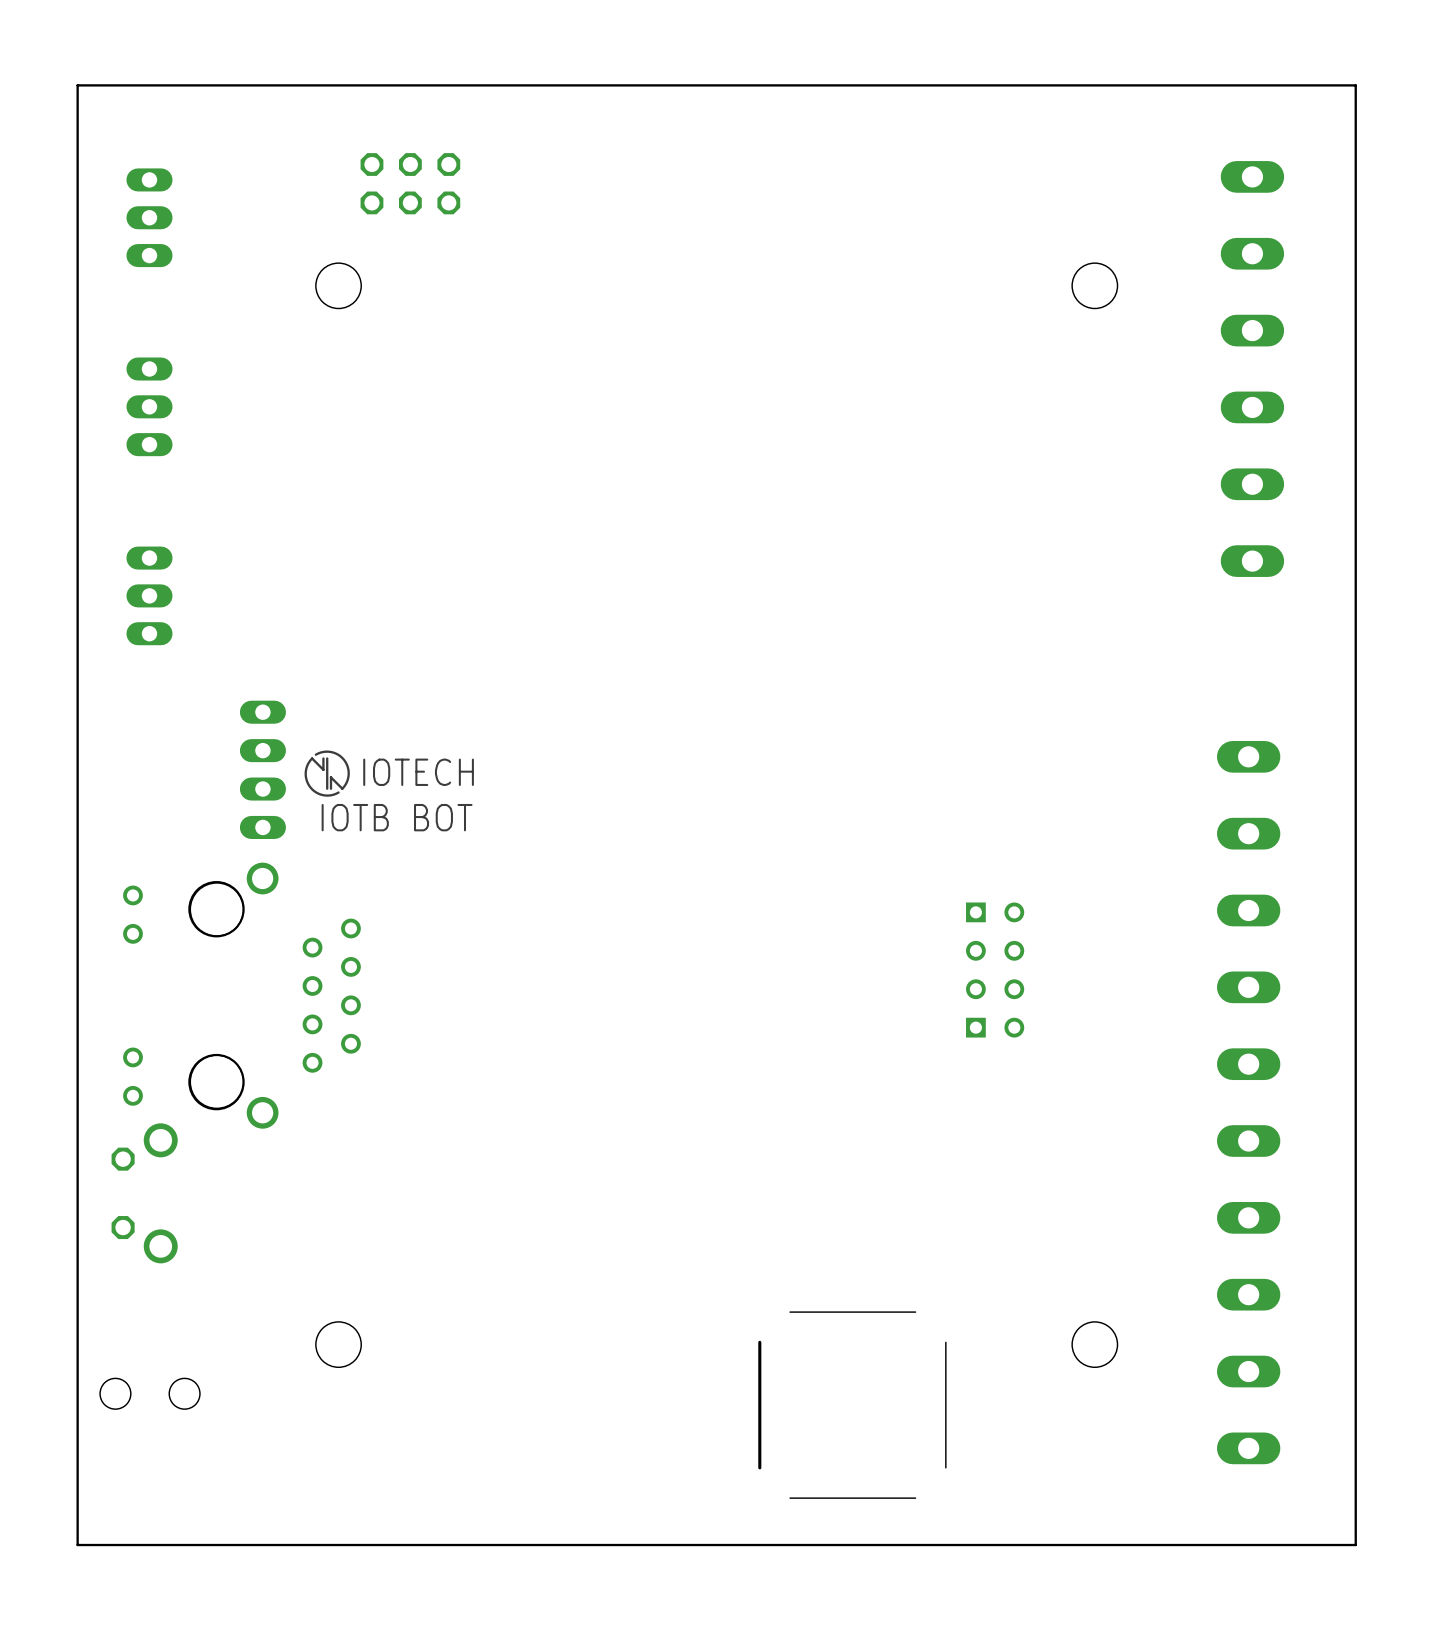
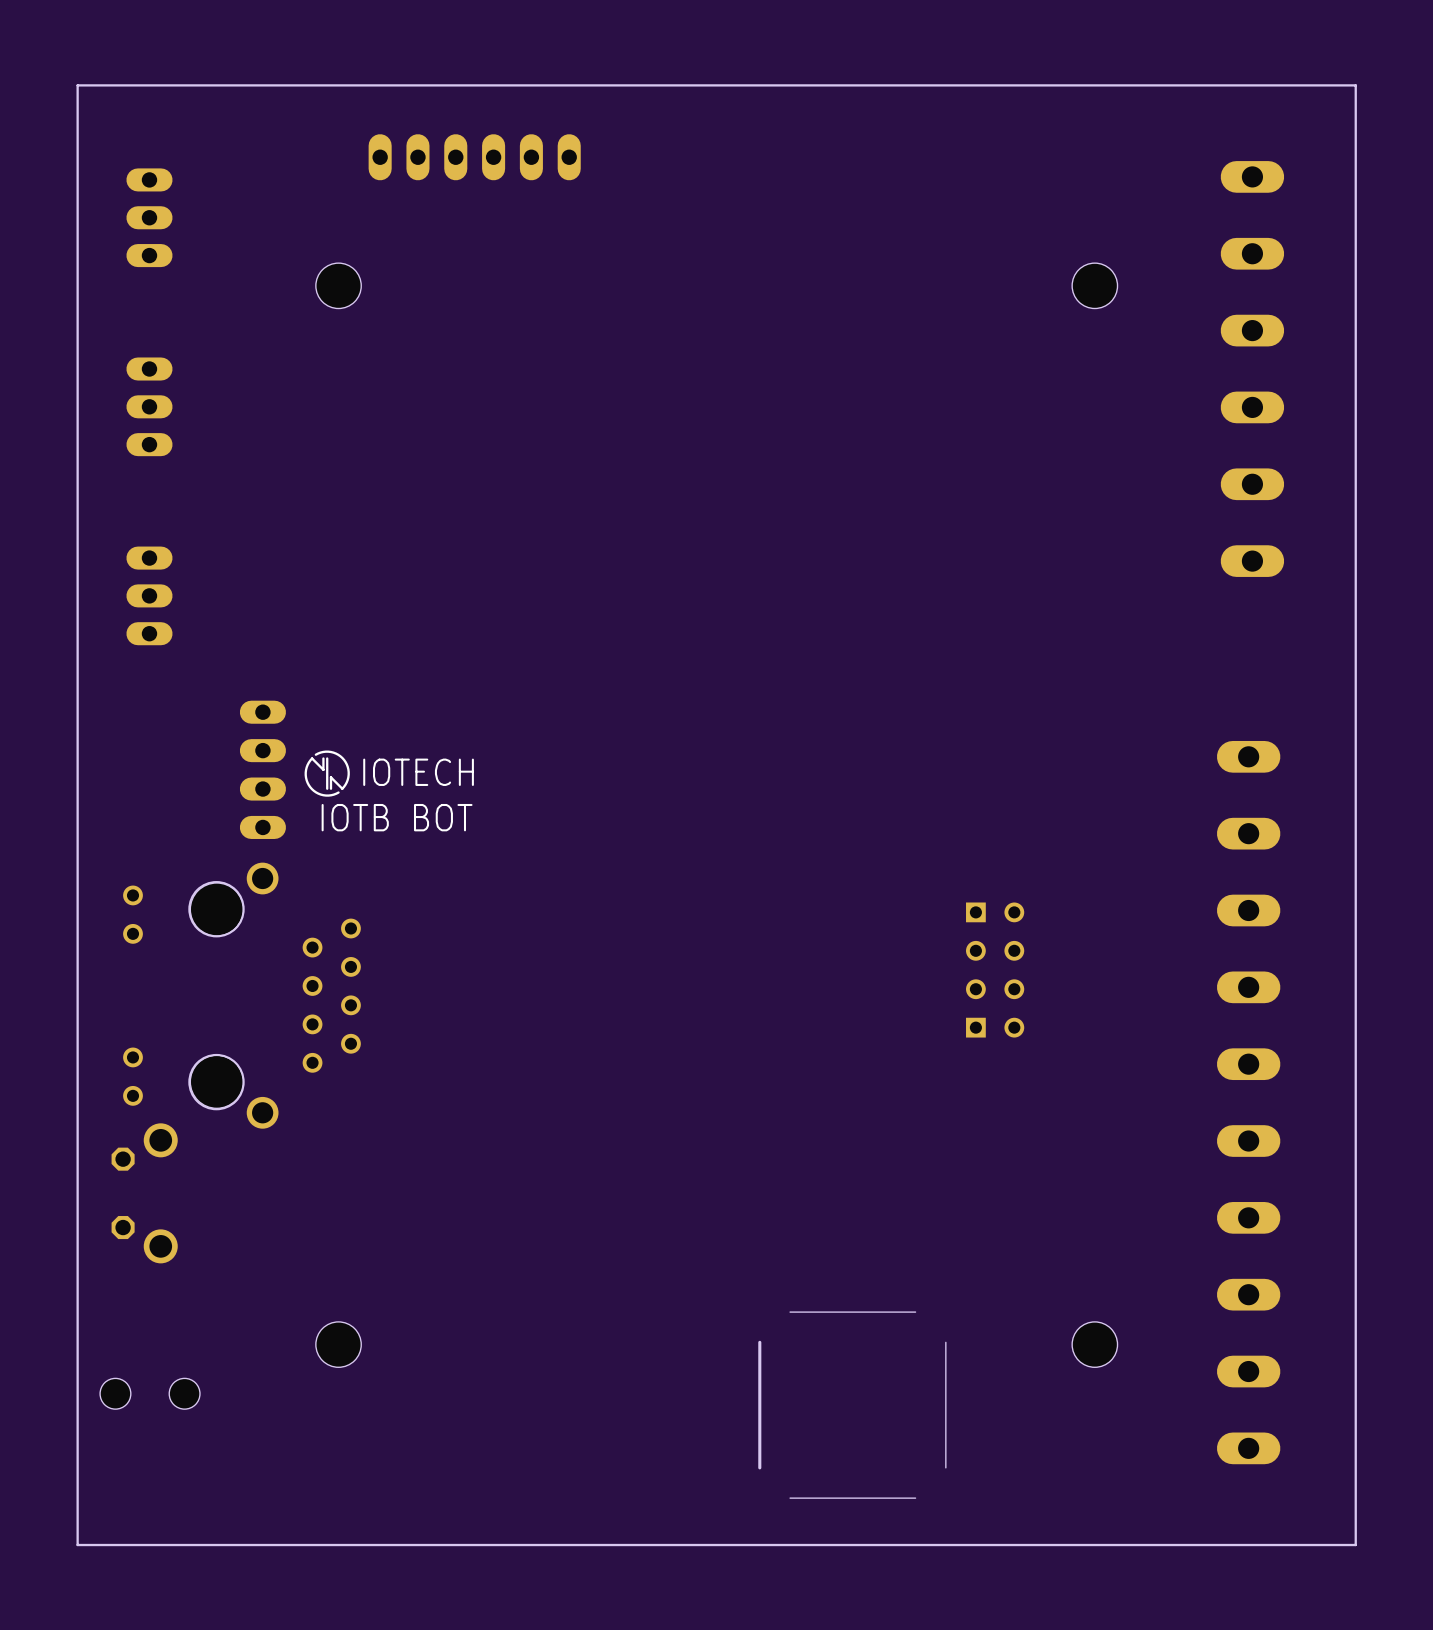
part: none -> (474, 157)
part: (410, 183) -> none

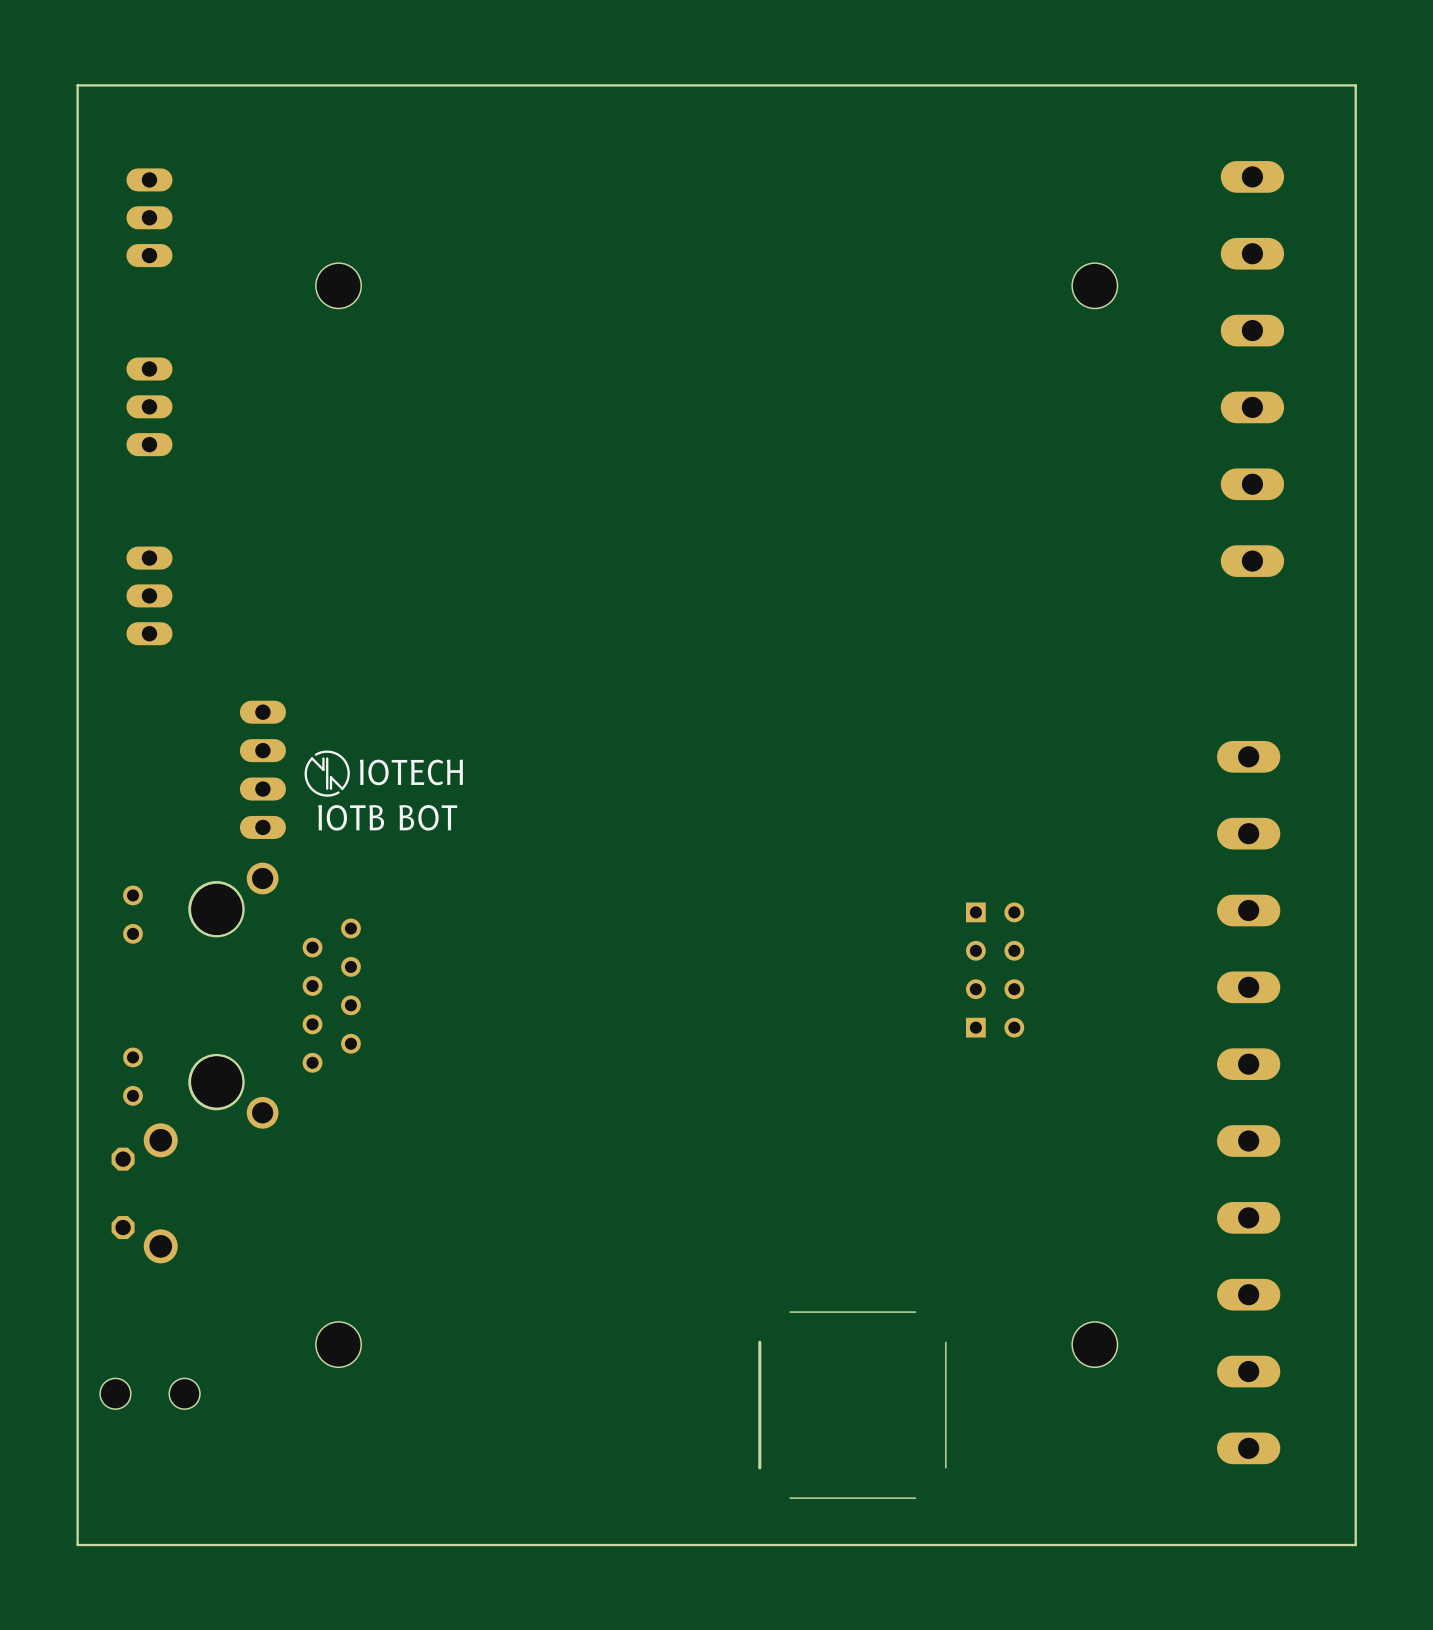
part: (474, 157) -> none

